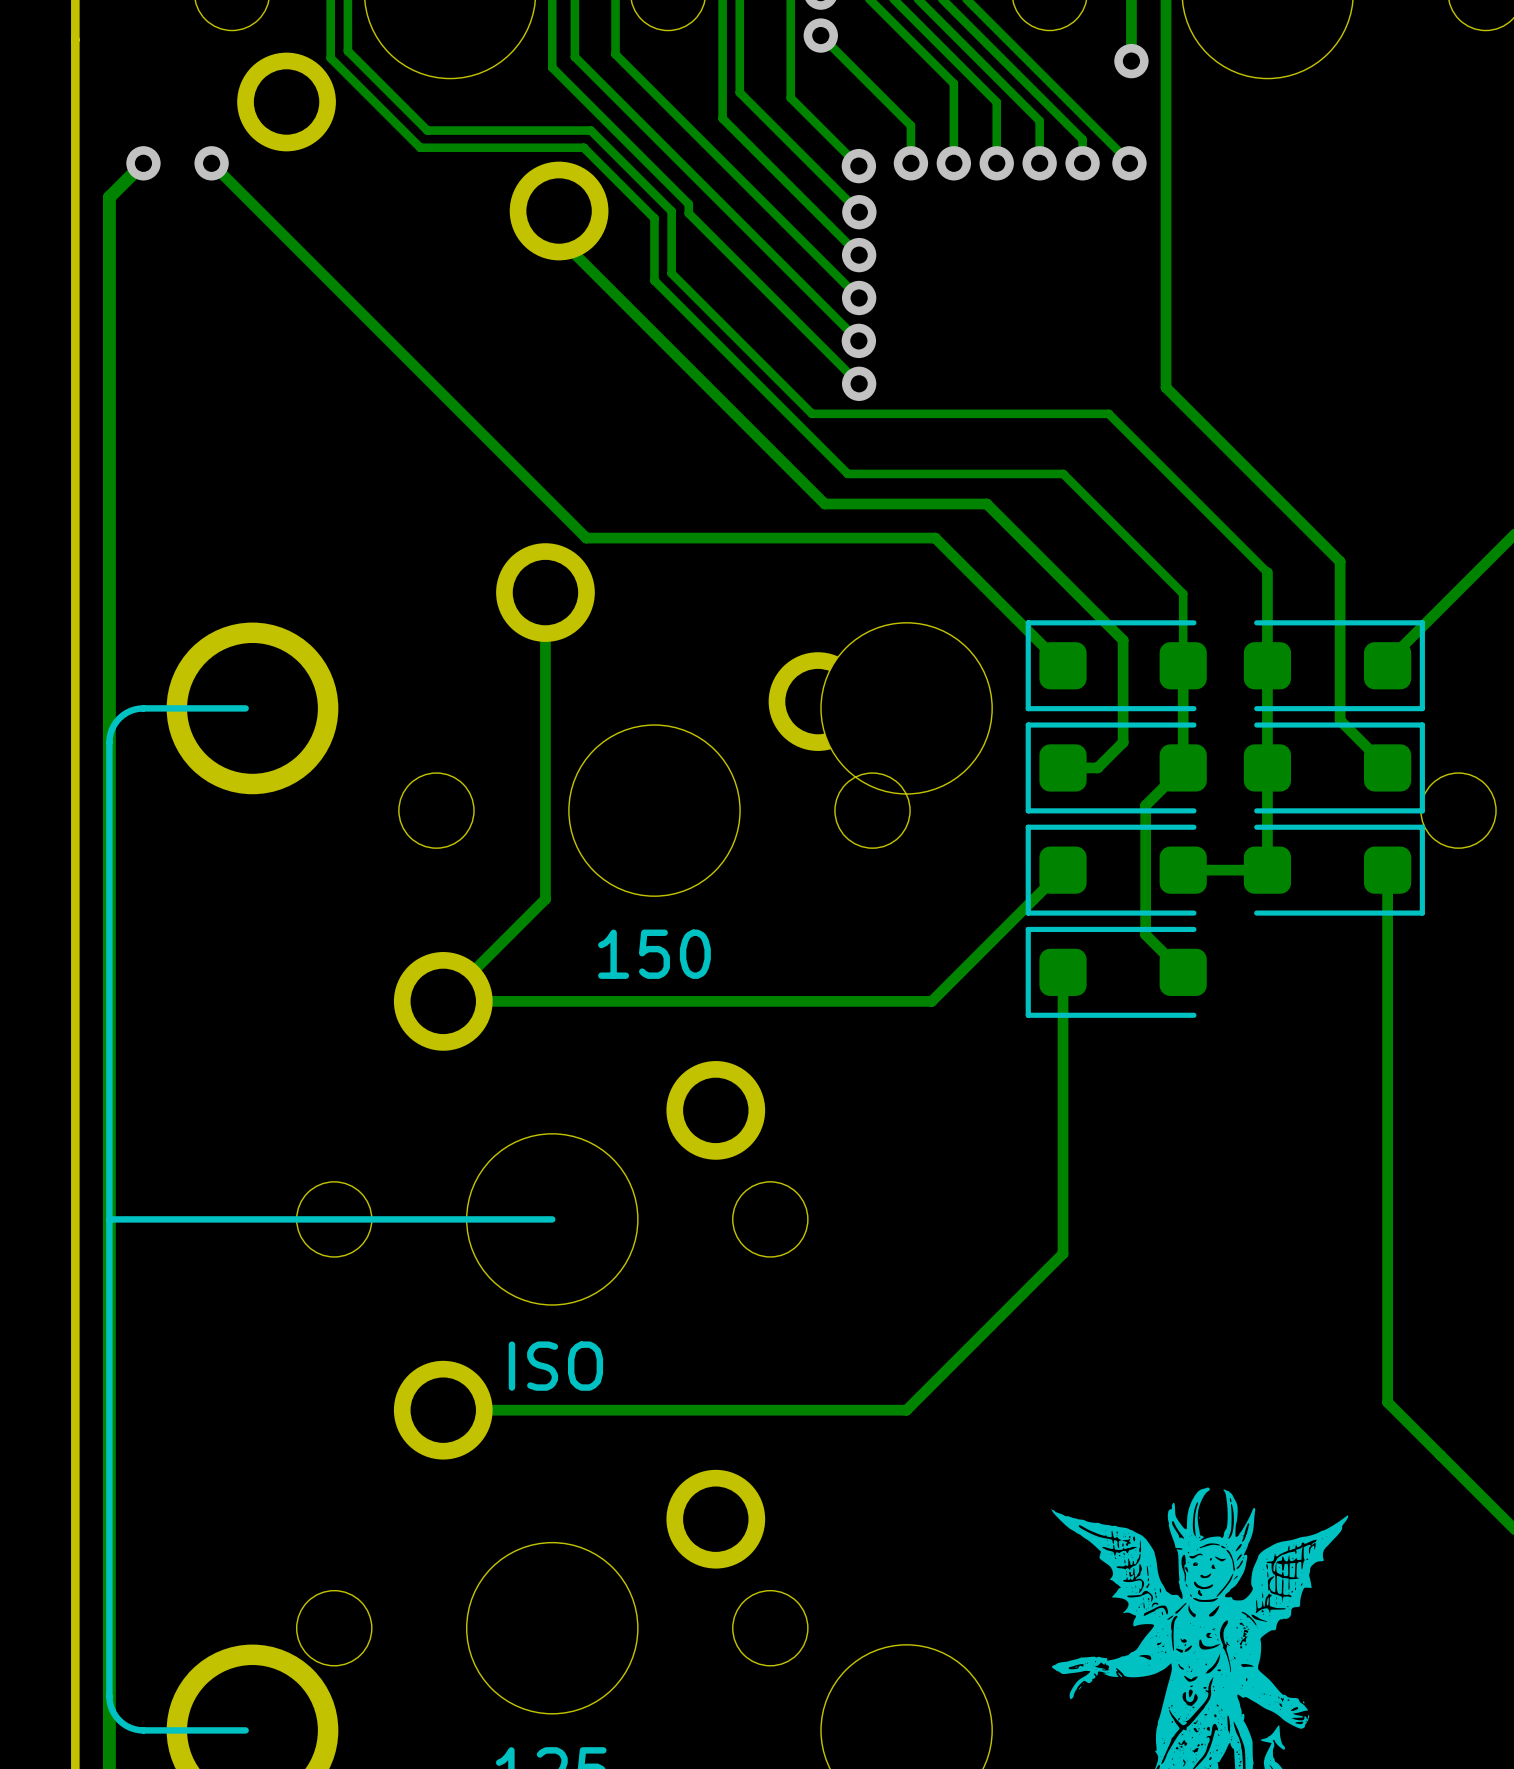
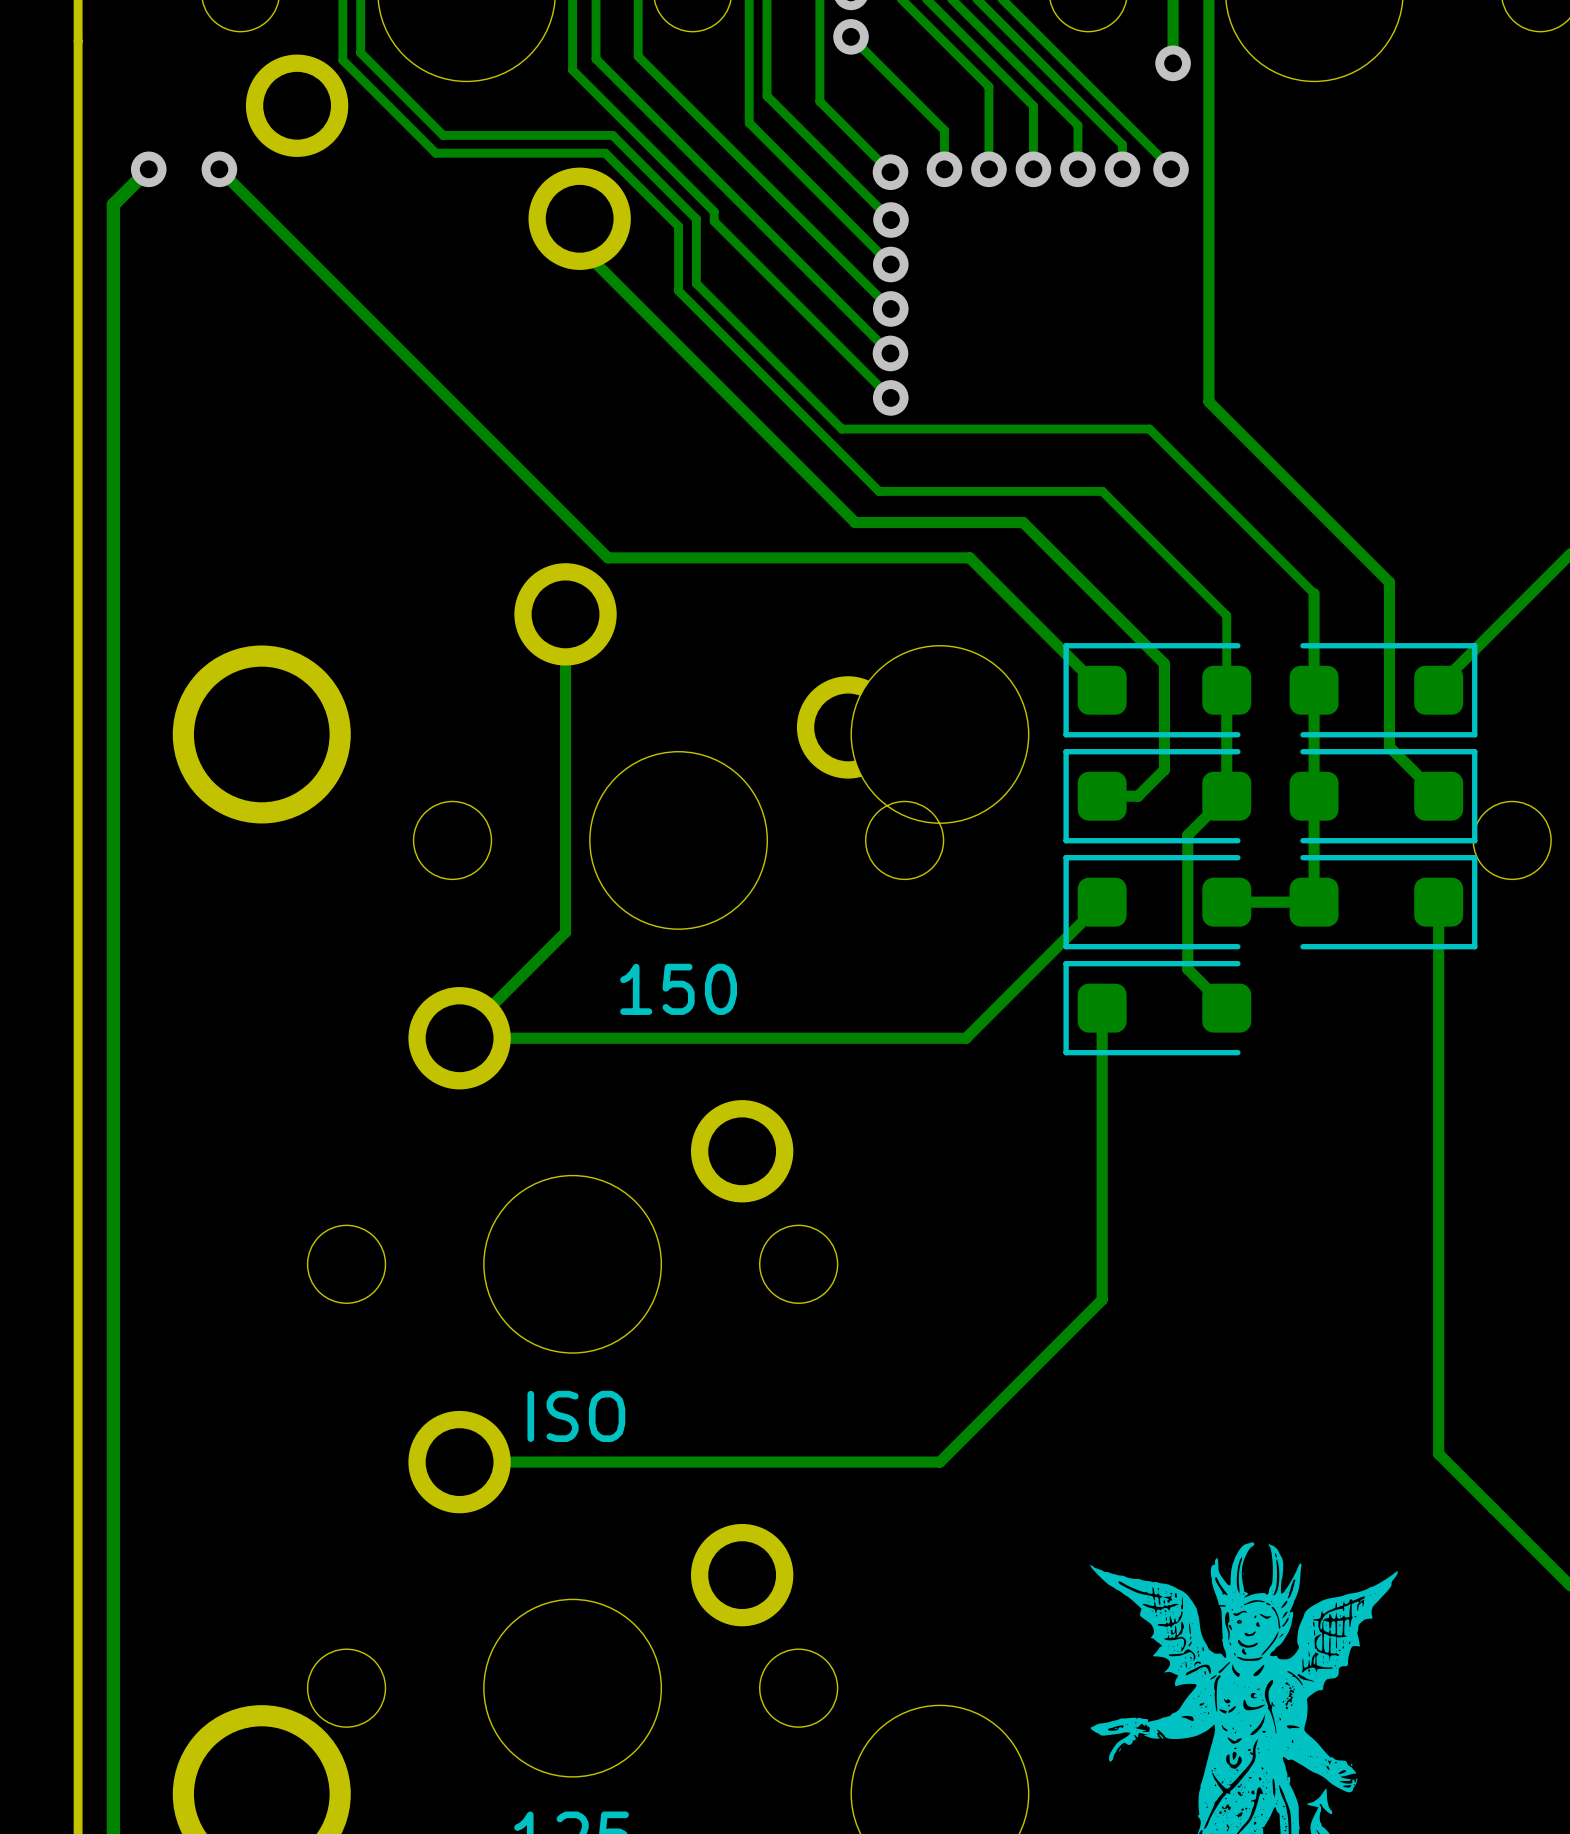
line: (245, 708) (134, 709) (126, 712) (116, 721) (110, 733) (109, 742) (109, 1700) (116, 1717) (122, 1723) (134, 1729) (245, 1730) -> none
line: (552, 1219) (109, 1219) -> none

